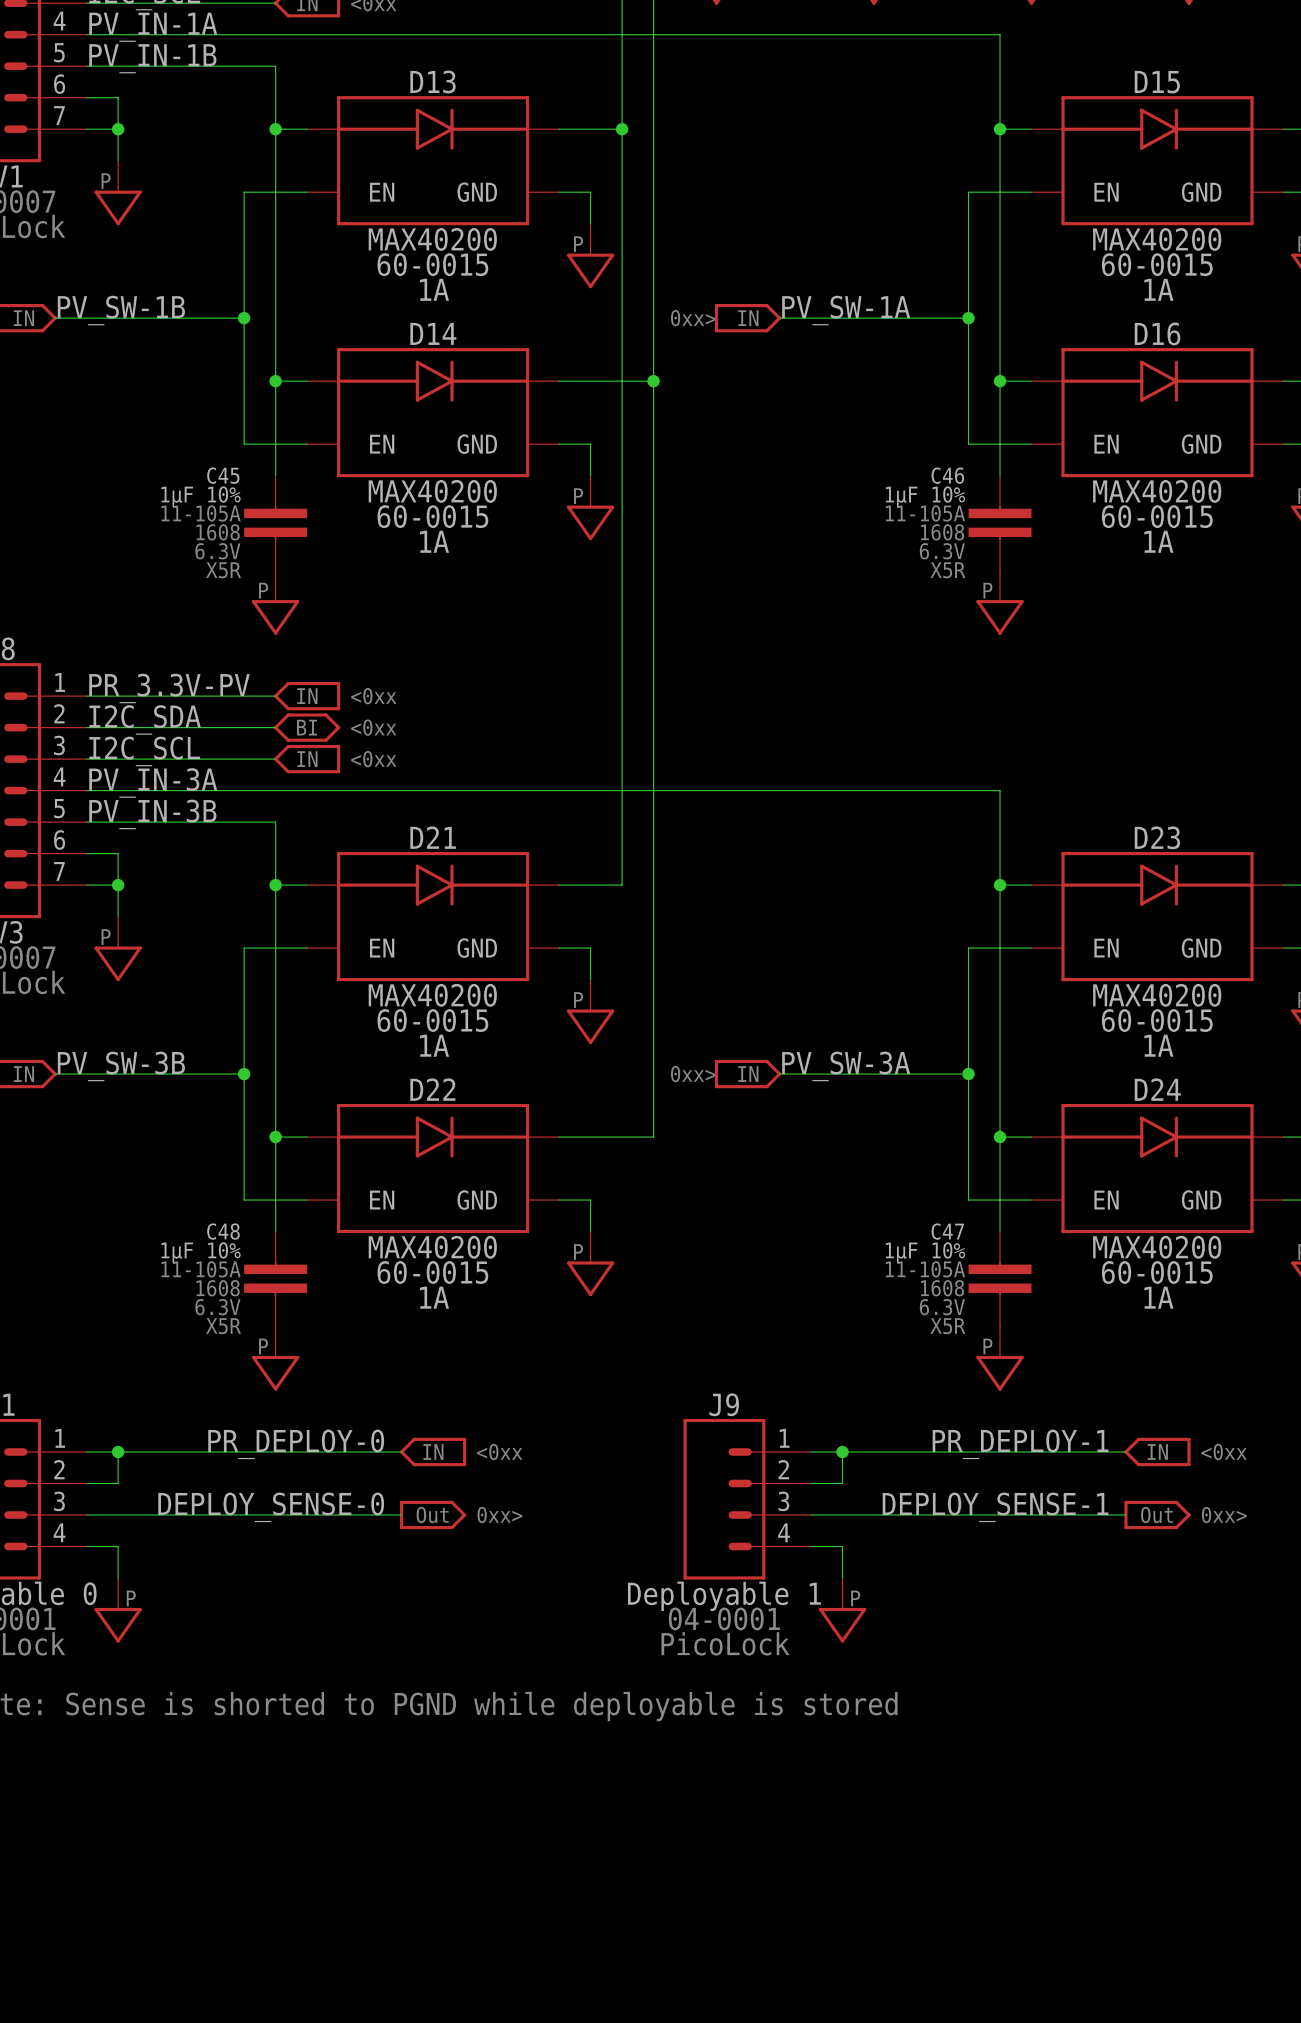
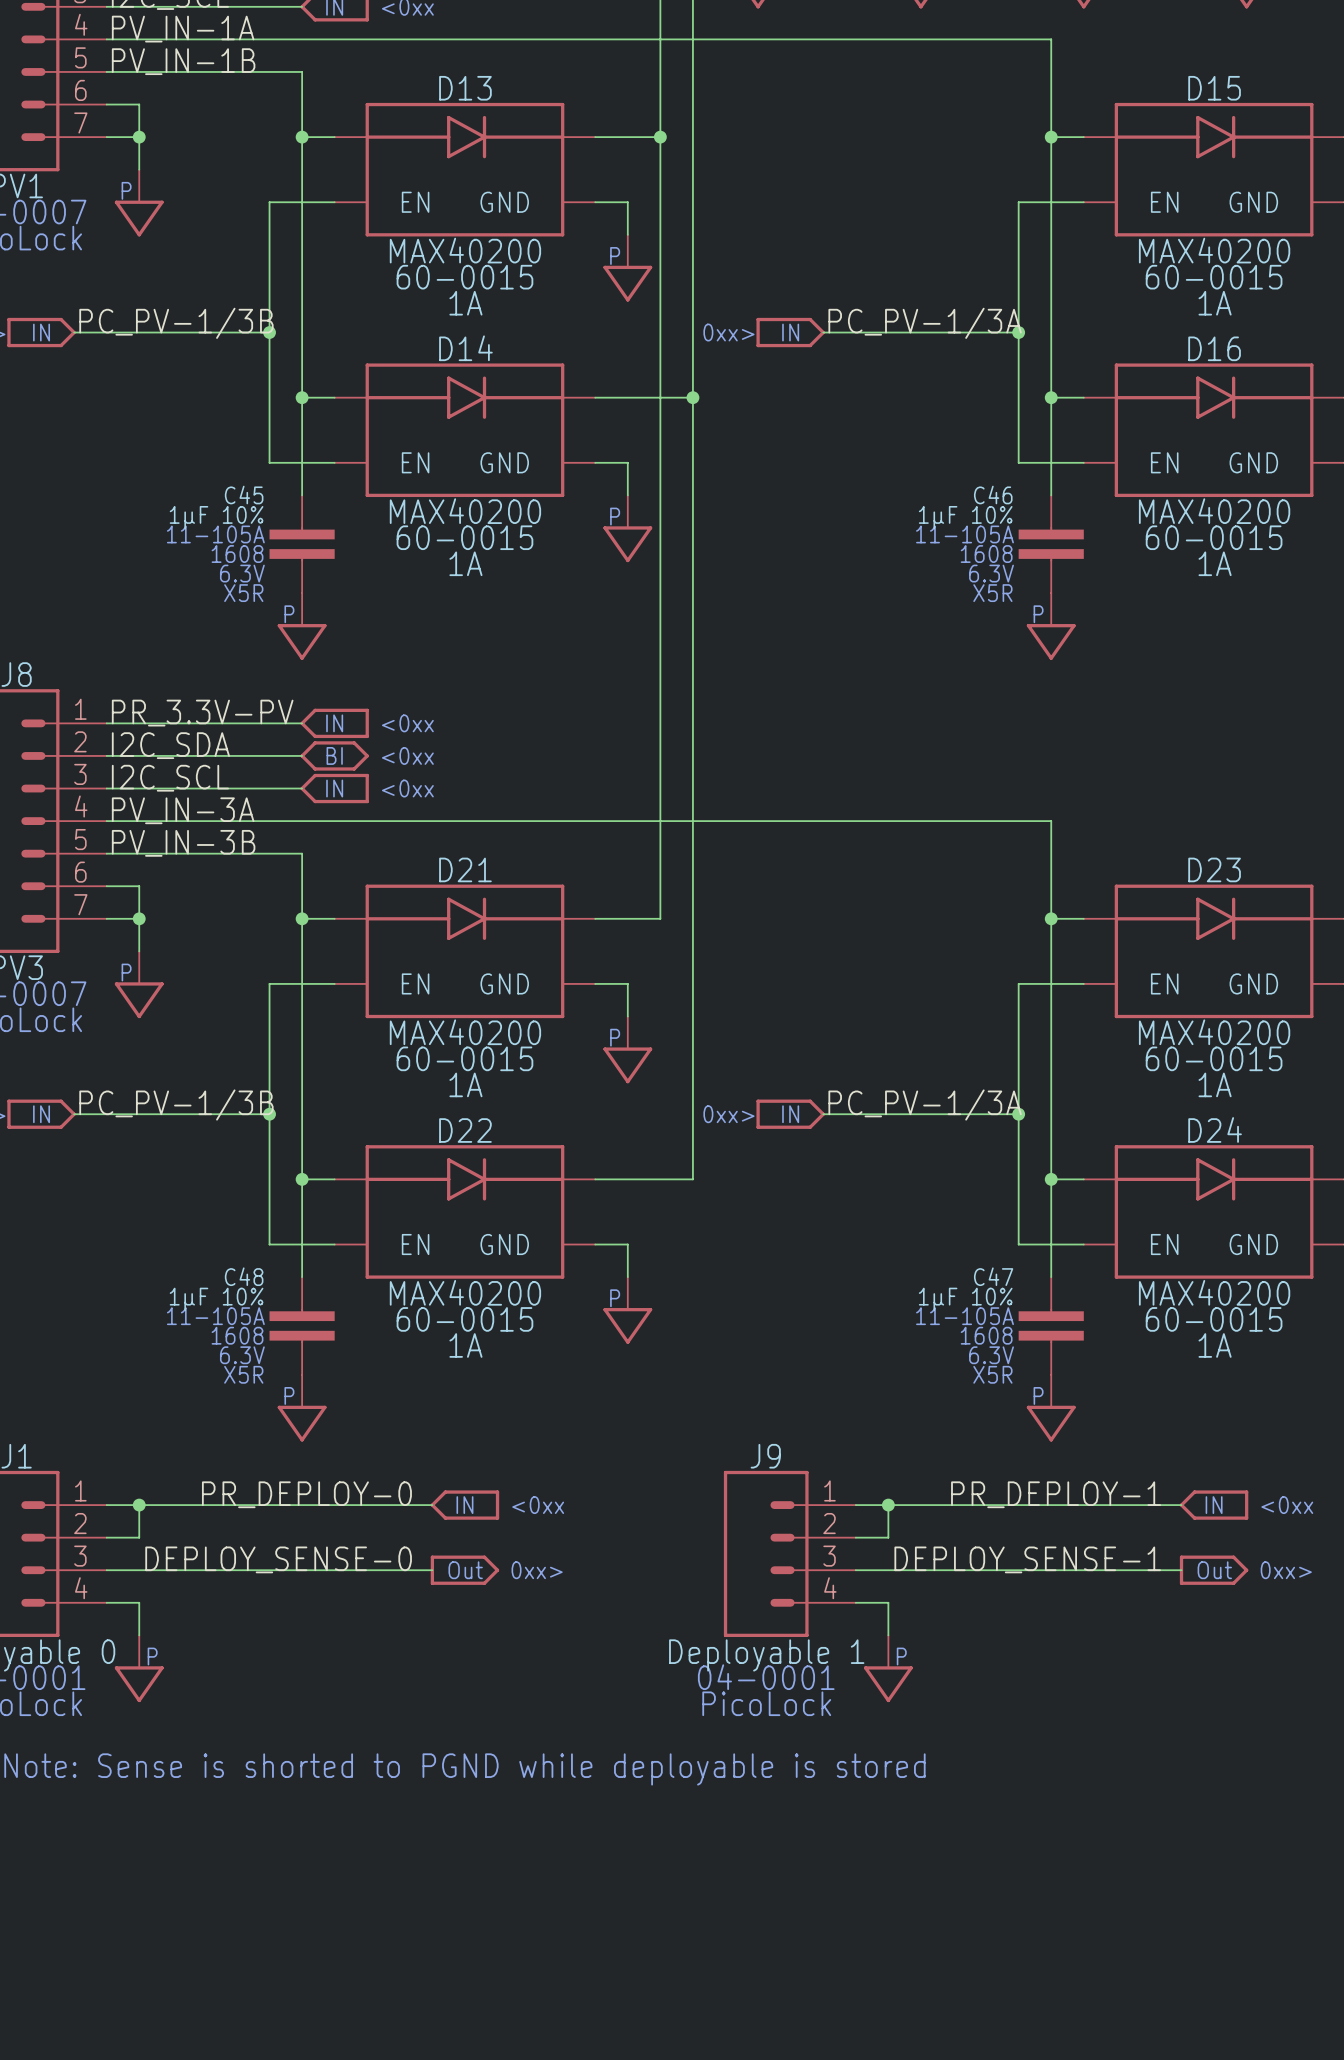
label: PV_SW-1B (121, 310) -> PC_PV-1/3B (176, 323)
label: PV_SW-1A (846, 310) -> PC_PV-1/3A (925, 323)
label: PV_SW-3B (121, 1066) -> PC_PV-1/3B (176, 1105)
label: PV_SW-3A (846, 1066) -> PC_PV-1/3A (925, 1105)

